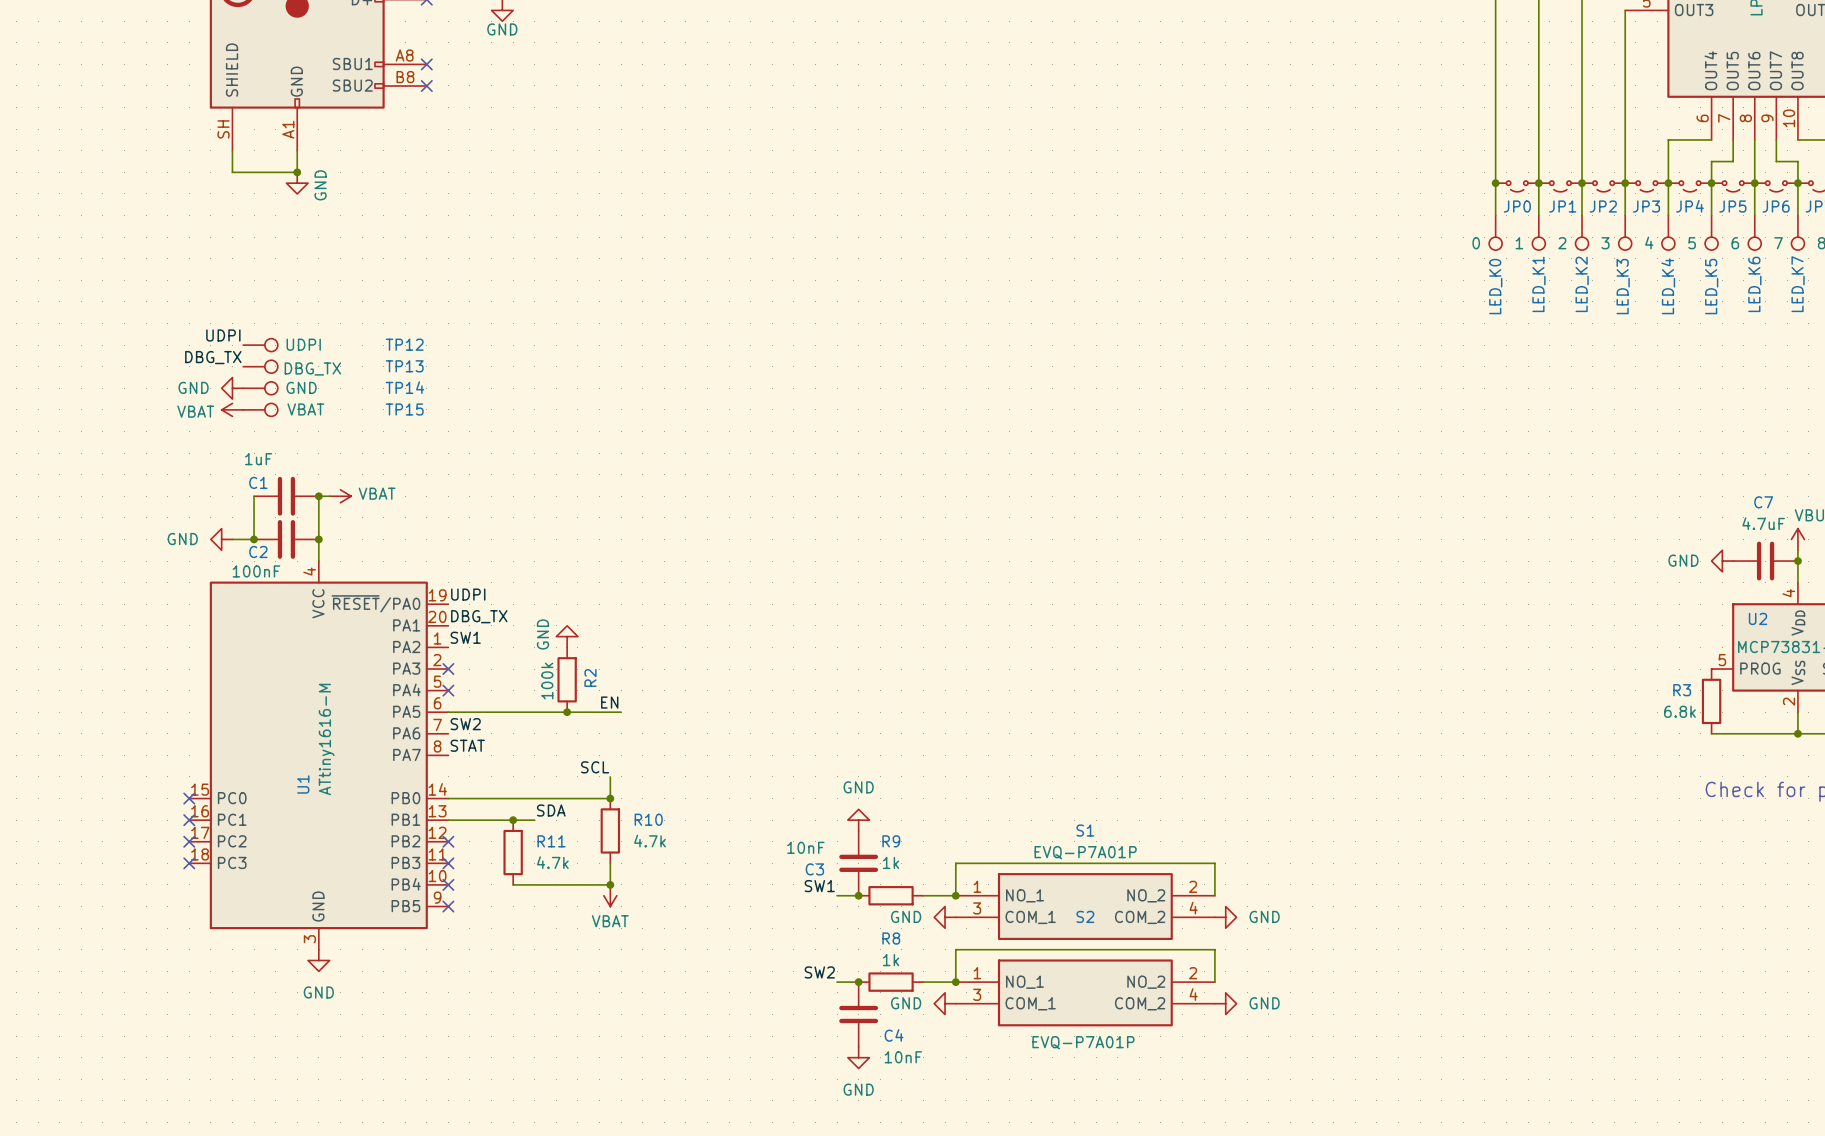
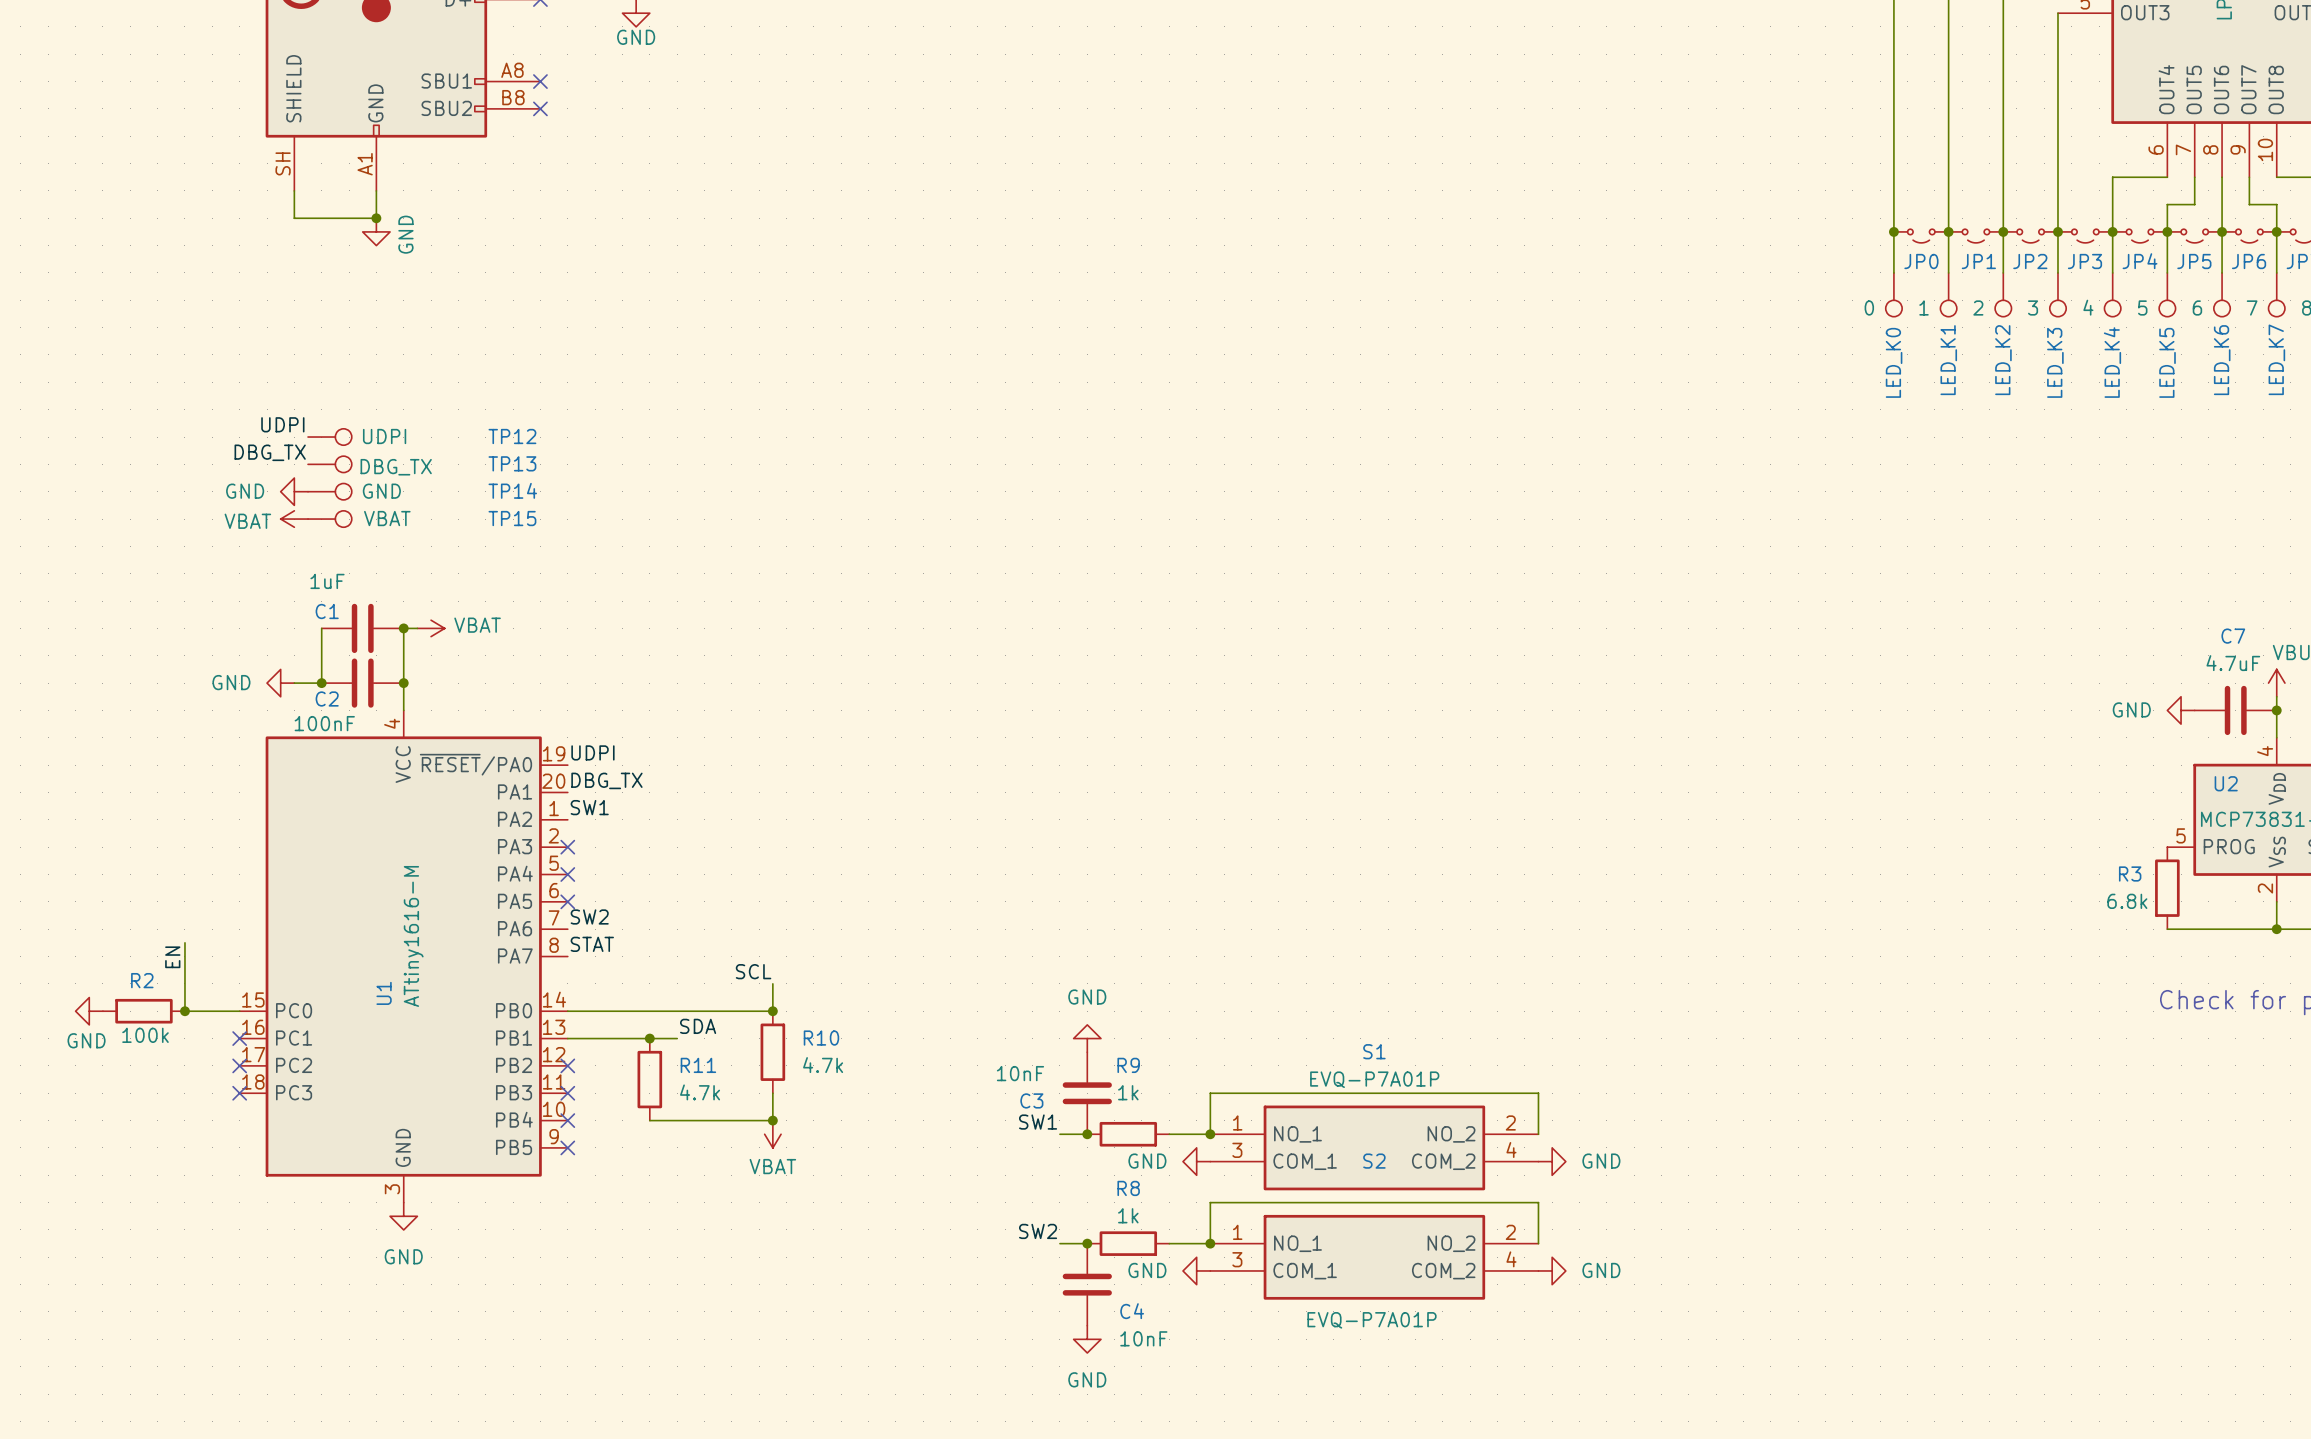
power symbol: GND (567, 636) -> none
R2 name position: R2 (590, 677) -> R2 (142, 980)
R2 rotation: 0° (567, 679) -> 90° clockwise (143, 1011)
R2 position: (567, 679) -> (143, 1011)
R2 value position: 100k (547, 681) -> 100k (145, 1035)
label: EN (609, 702) -> none
wire: (448, 712) (621, 712) -> none
no-connect mark: none -> (567, 901)
junction: (567, 712) -> none
wire: none -> (184, 942) (184, 1011) (239, 1011)
label: none -> EN (172, 957)
power symbol: none -> GND (89, 1011)
junction: none -> (184, 1011)
no-connect mark: (189, 798) -> none

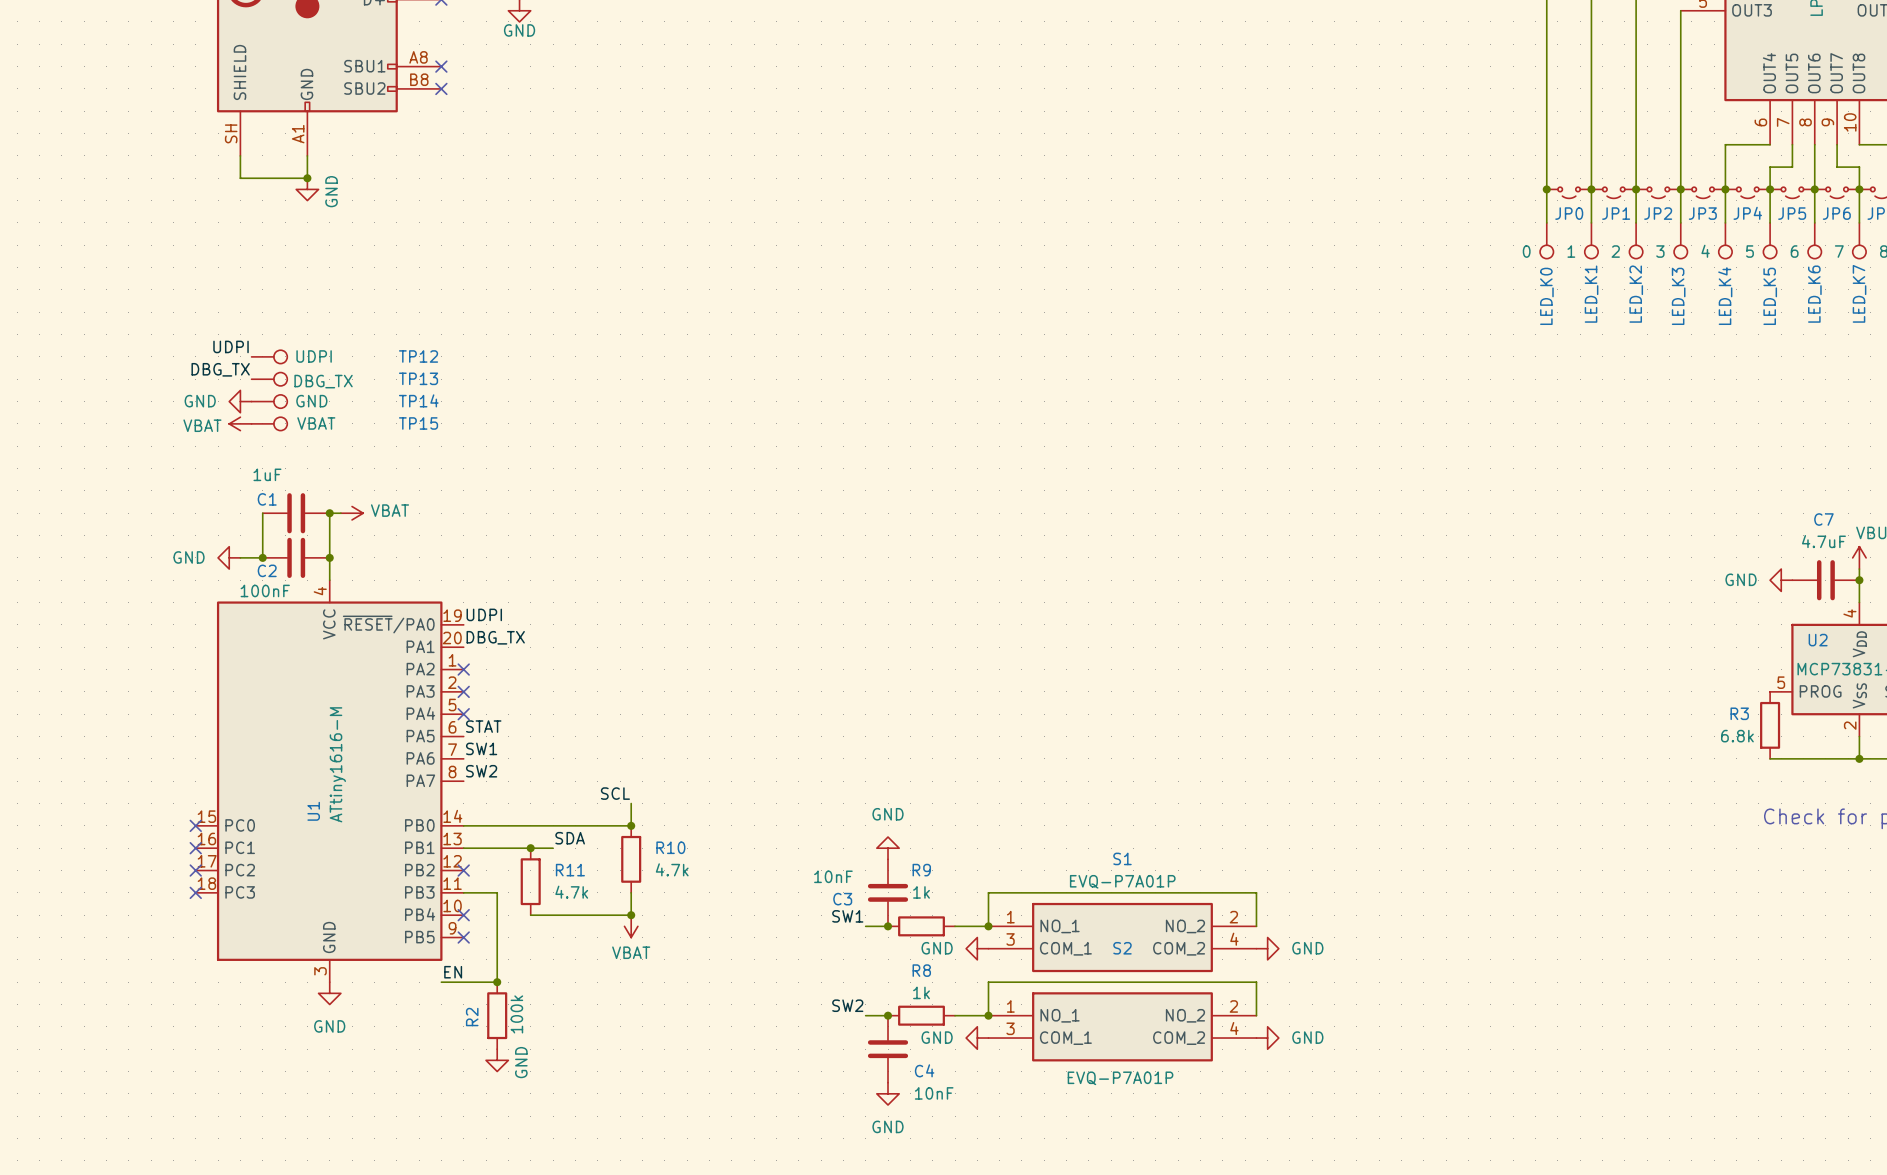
label: SW1 (589, 807) -> none
no-connect mark: none -> (463, 669)
label: none -> STAT (483, 726)
no-connect mark: (567, 901) -> none
label: SW2 (589, 916) -> SW1 (481, 748)
wire: (184, 942) (184, 1011) (239, 1011) -> none
label: STAT (592, 944) -> SW2 (481, 771)
label: EN (172, 957) -> none
R2 name position: R2 (142, 980) -> R2 (472, 1017)
power symbol: GND (89, 1011) -> none
R2 rotation: 0° (143, 1011) -> 90° clockwise (497, 1015)
R2 position: (143, 1011) -> (497, 1015)
junction: (184, 1011) -> none
no-connect mark: none -> (195, 825)
R2 value position: 100k (145, 1035) -> 100k (516, 1014)
wire: none -> (463, 892) (497, 892) (497, 982) (441, 982)
no-connect mark: (567, 1093) -> none
label: none -> EN (453, 972)
junction: none -> (497, 982)
power symbol: none -> GND (497, 1060)

